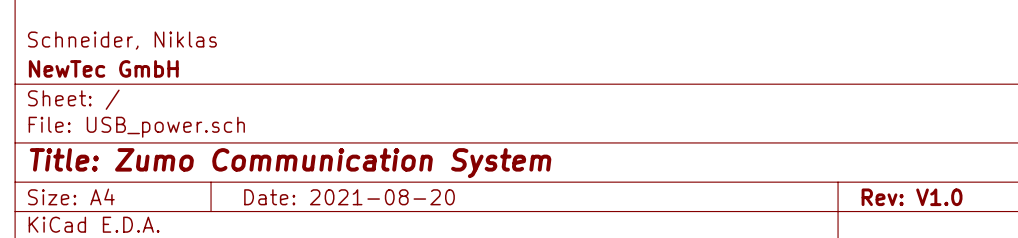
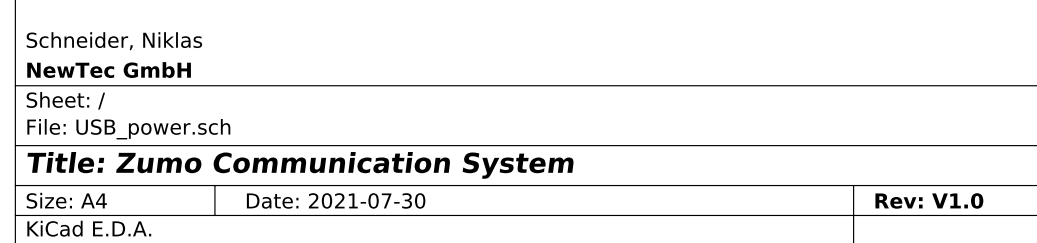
title block: Date: 2021-08-20 (349, 197) -> Date: 2021-07-30 (336, 200)

